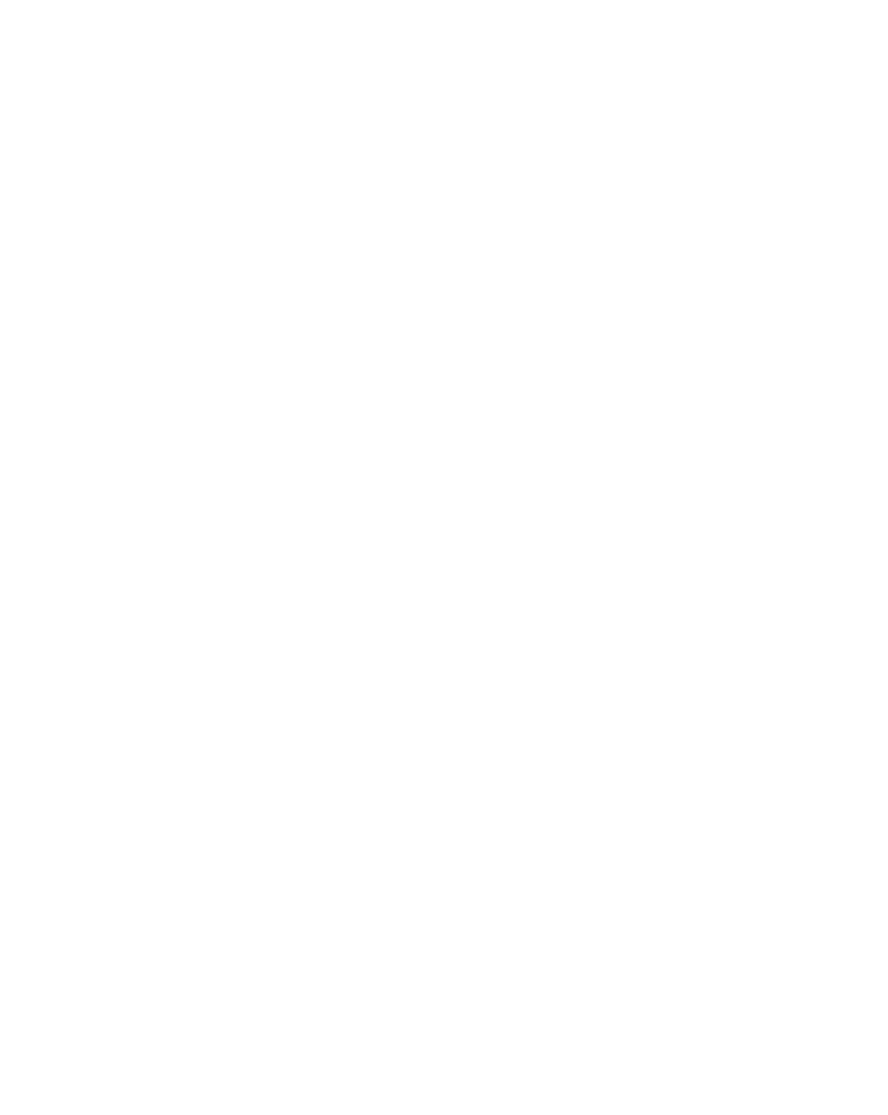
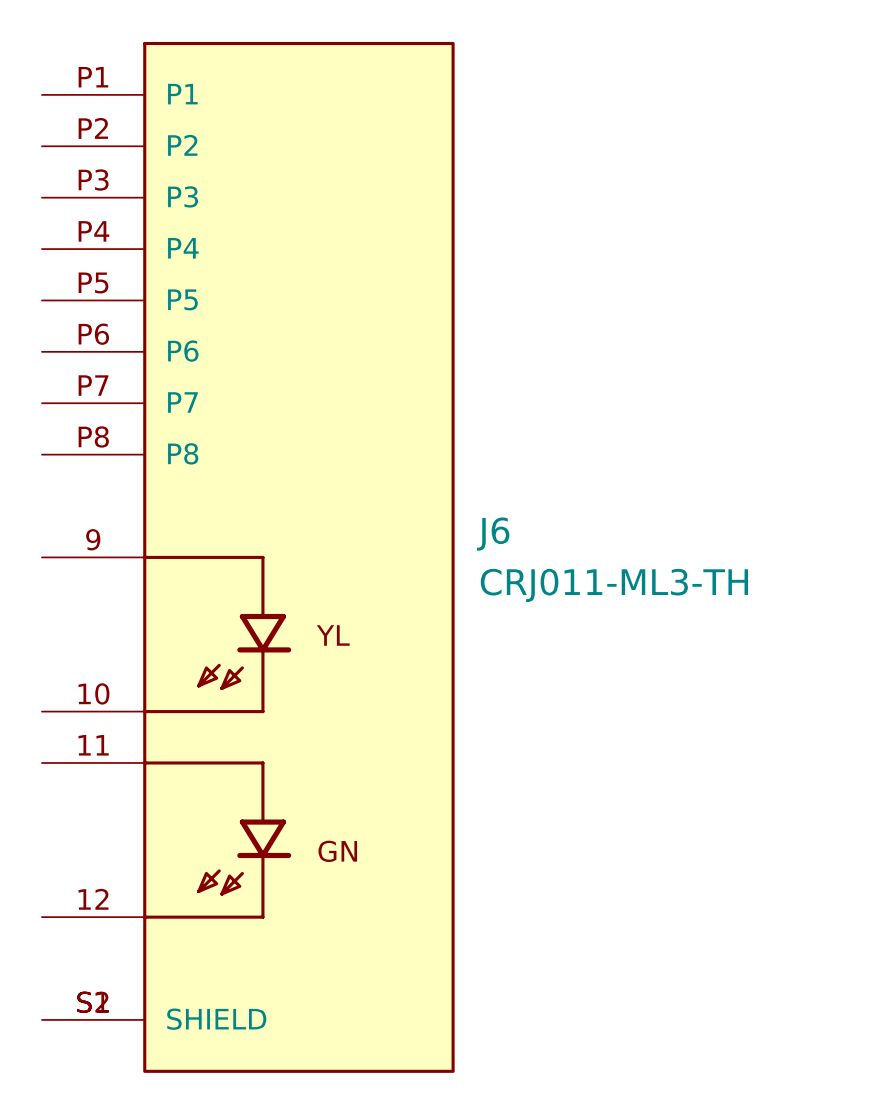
J6: none -> CRJ011-ML3-TH (248, 557)

